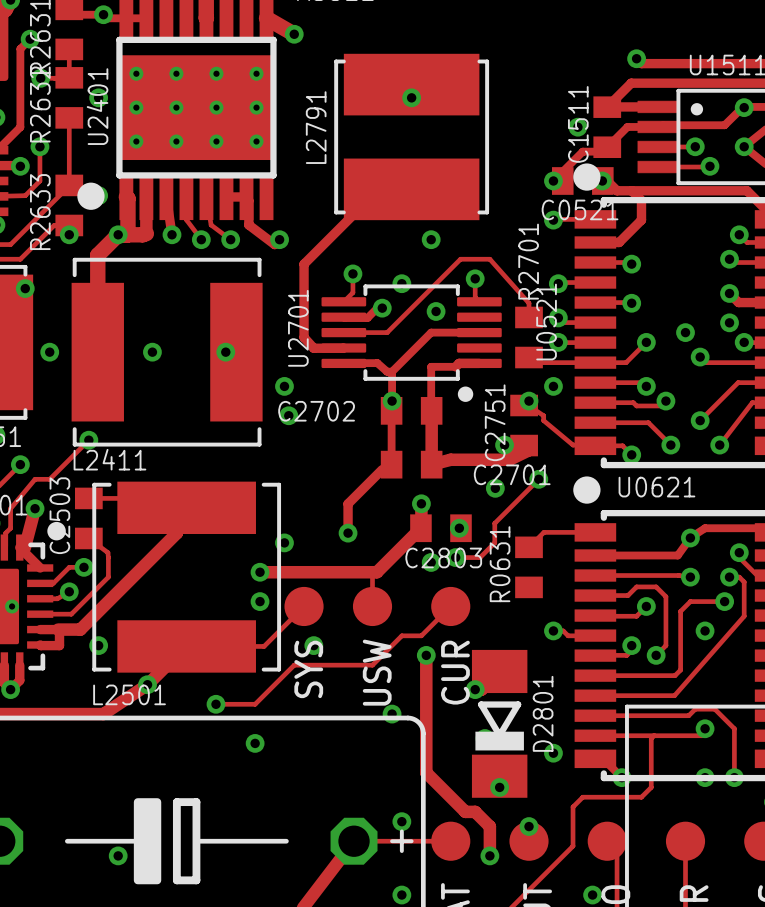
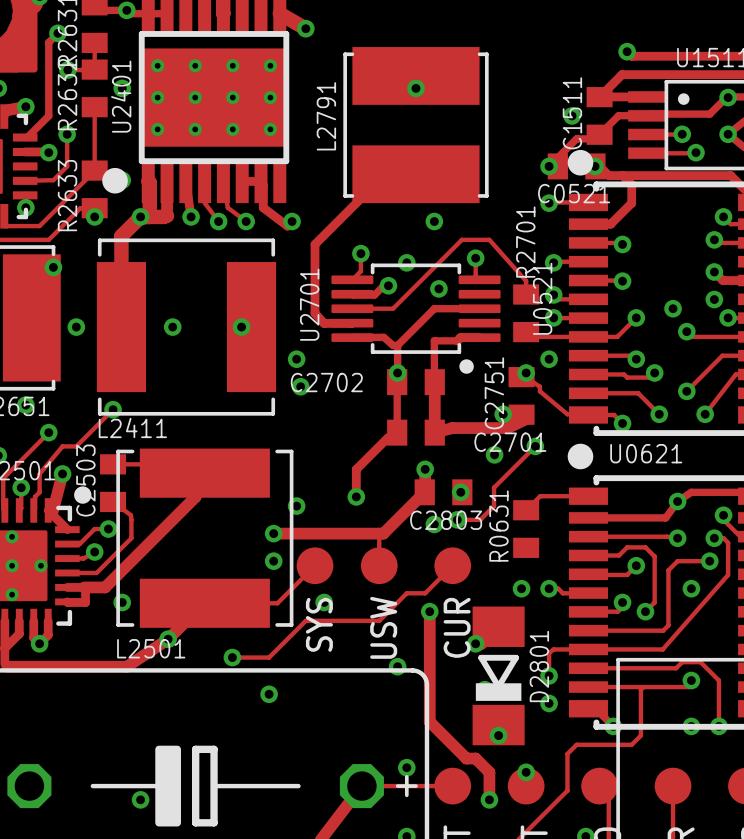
via: none -> (521, 588)
track: none -> (588, 649) (553, 649) (549, 652) (549, 675)
via: none -> (549, 675)

